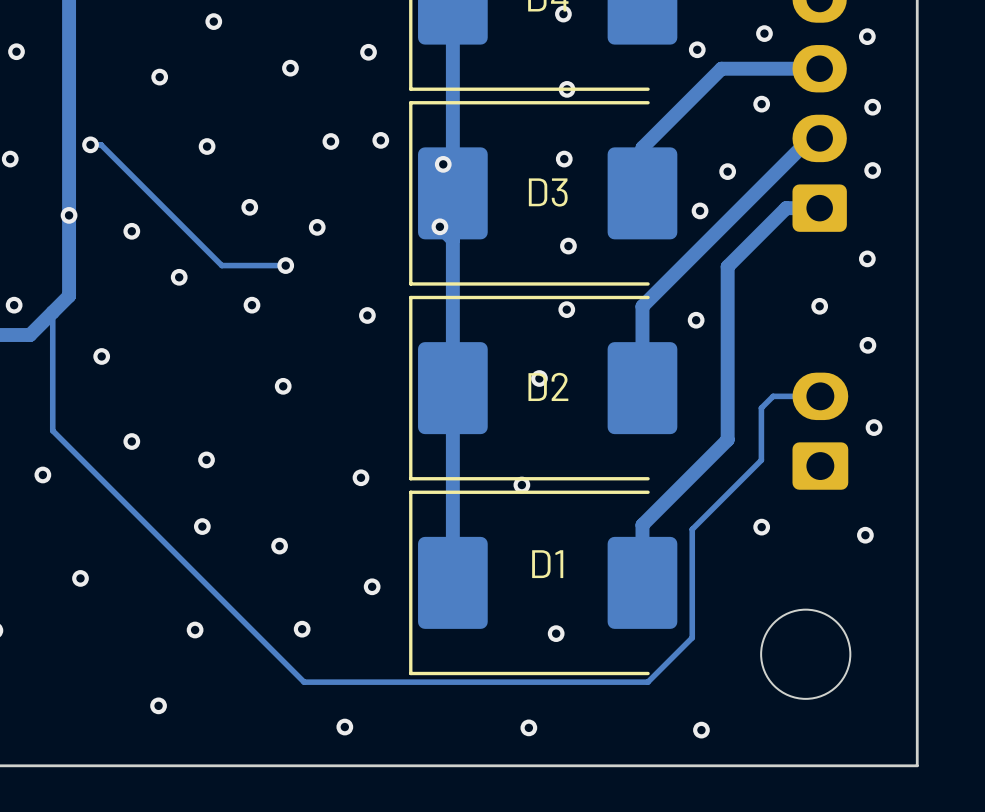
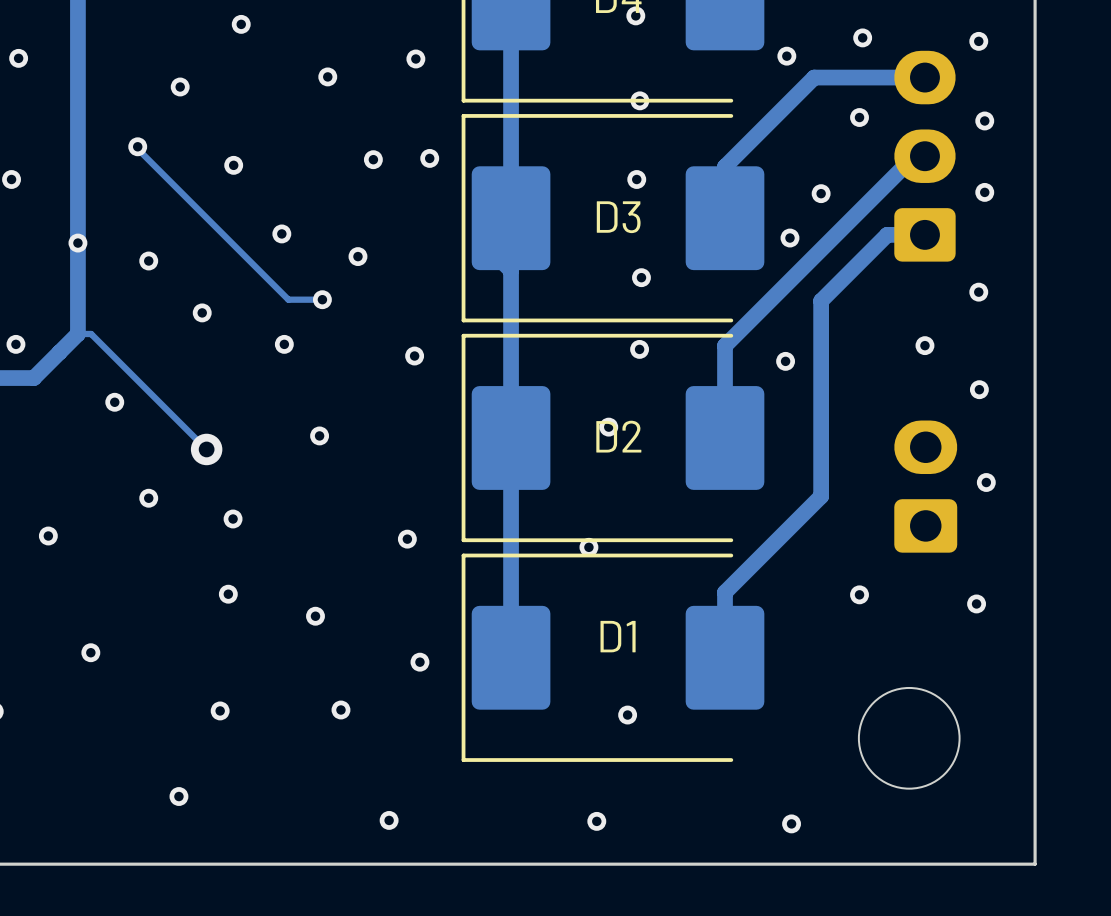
track: (90, 144) (101, 144) (221, 265) (255, 265) -> (137, 146) (137, 148) (288, 299)
via position: (90, 144) -> (137, 146)
via: (443, 164) -> none
via: (439, 226) -> none
track: none -> (77, 333) (91, 333) (206, 449)
track: (52, 312) (52, 430) (304, 682) (647, 682) (692, 637) (692, 529) (761, 460) (761, 408) (773, 396) (820, 396) -> none
via: none -> (206, 449)

